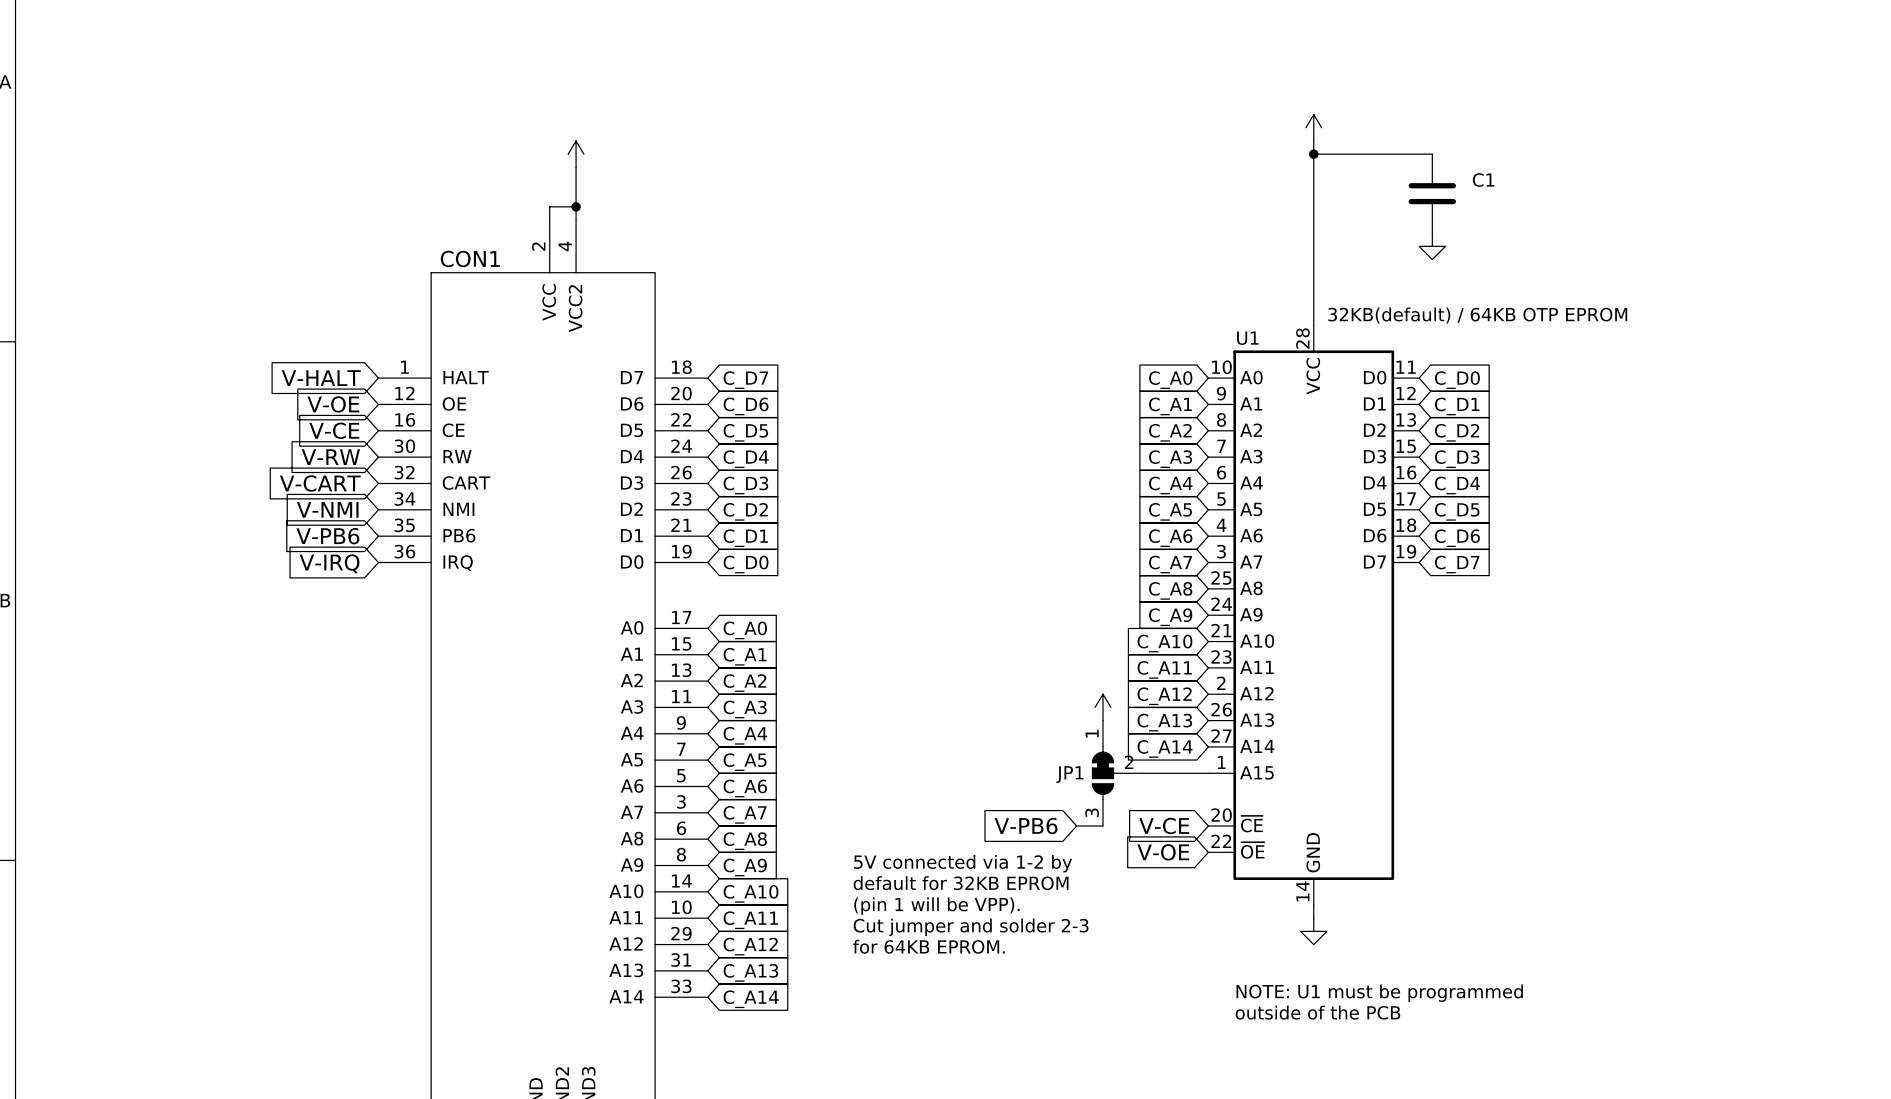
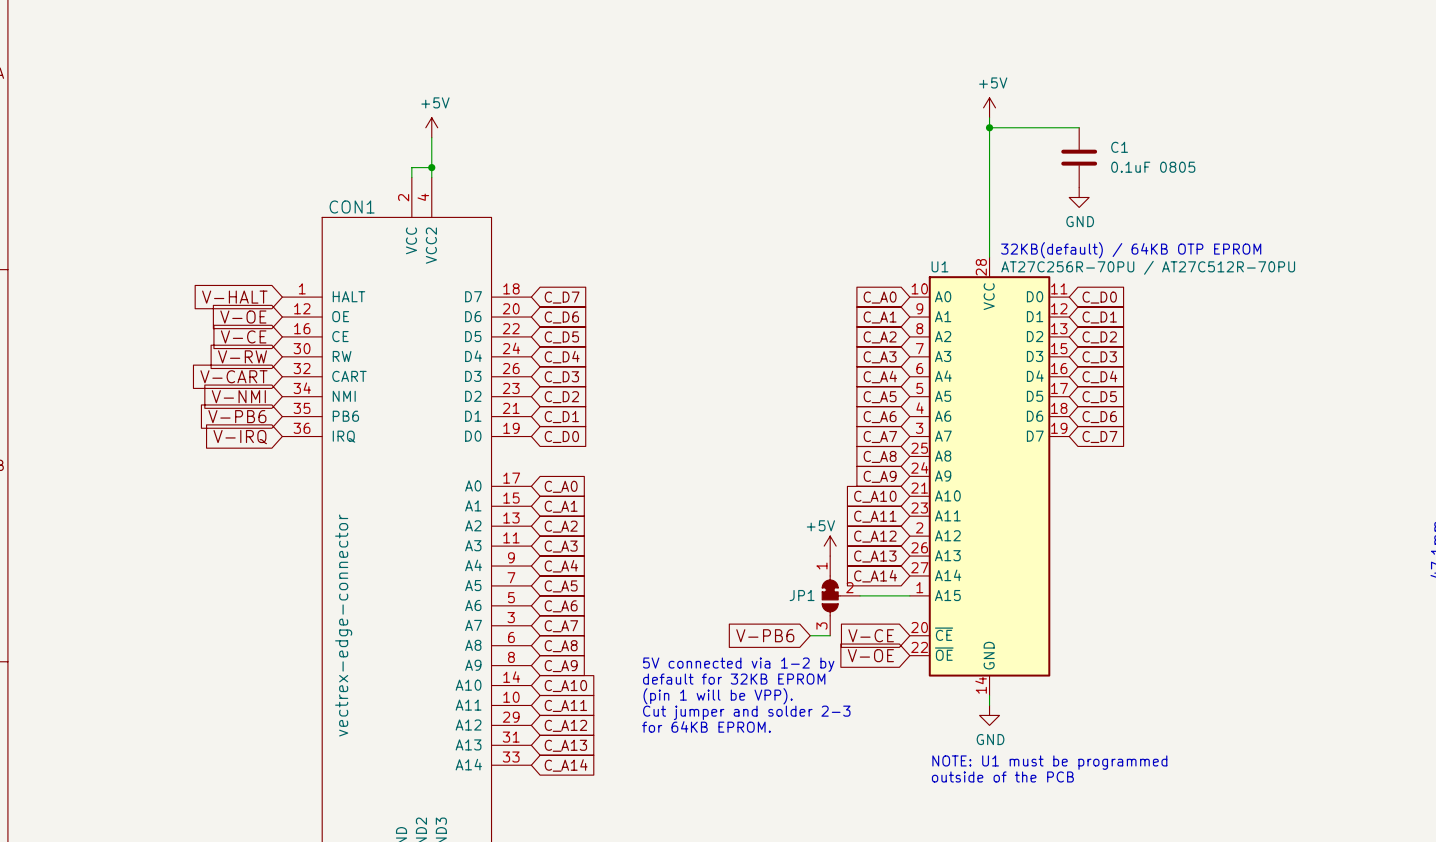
power symbol text: none -> +5V (993, 82)
power symbol text: none -> +5V (435, 102)
C1 value: none -> 0.1uF 0805 (1153, 167)
power symbol text: none -> GND (1080, 221)
U1 value: none -> AT27C256R-70PU / AT27C512R-70PU (1148, 267)
power symbol text: none -> +5V (820, 525)
CON1 value: none -> vectrex-edge-connector (343, 625)
power symbol text: none -> GND (990, 739)

